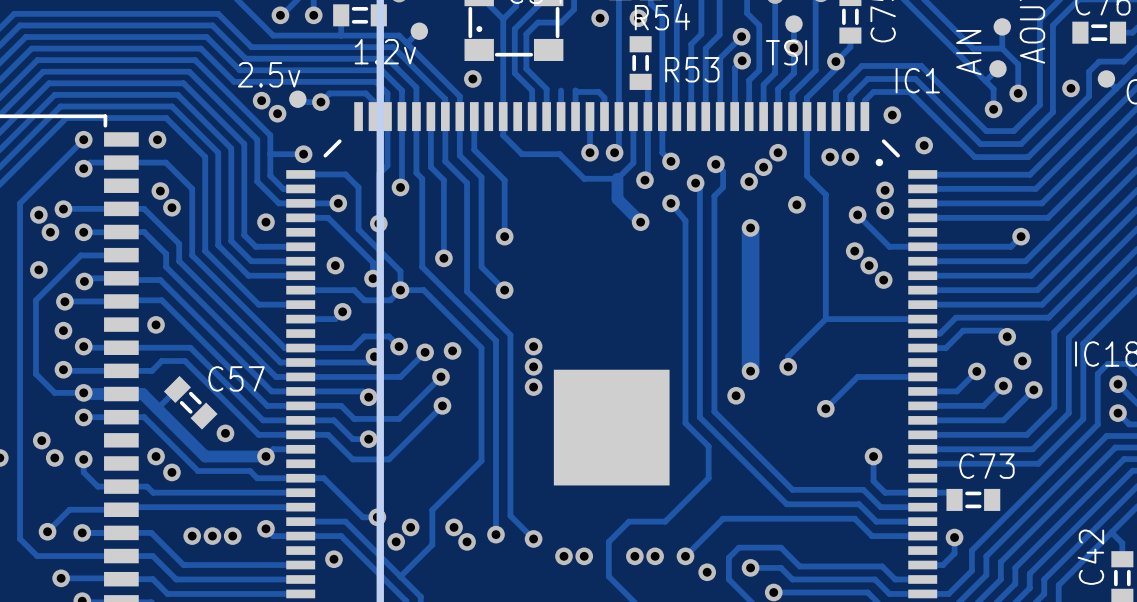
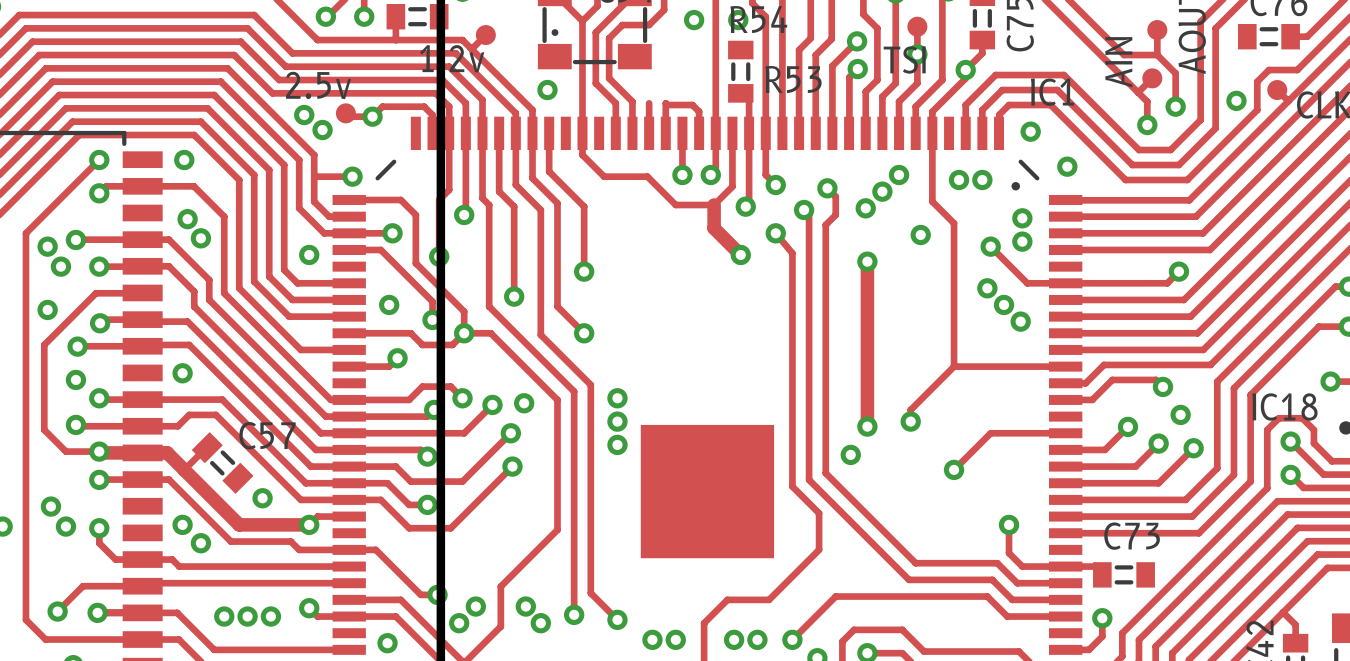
track width: thick (750, 227) (750, 371) -> thin (867, 261) (867, 426)

